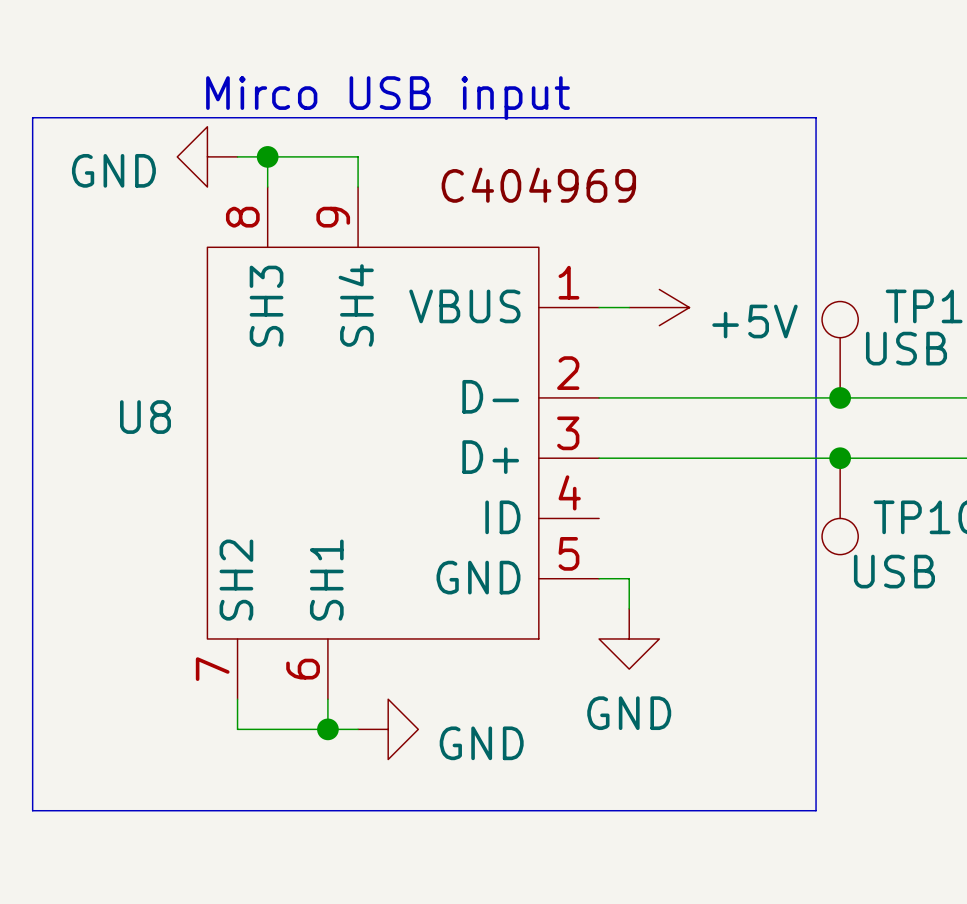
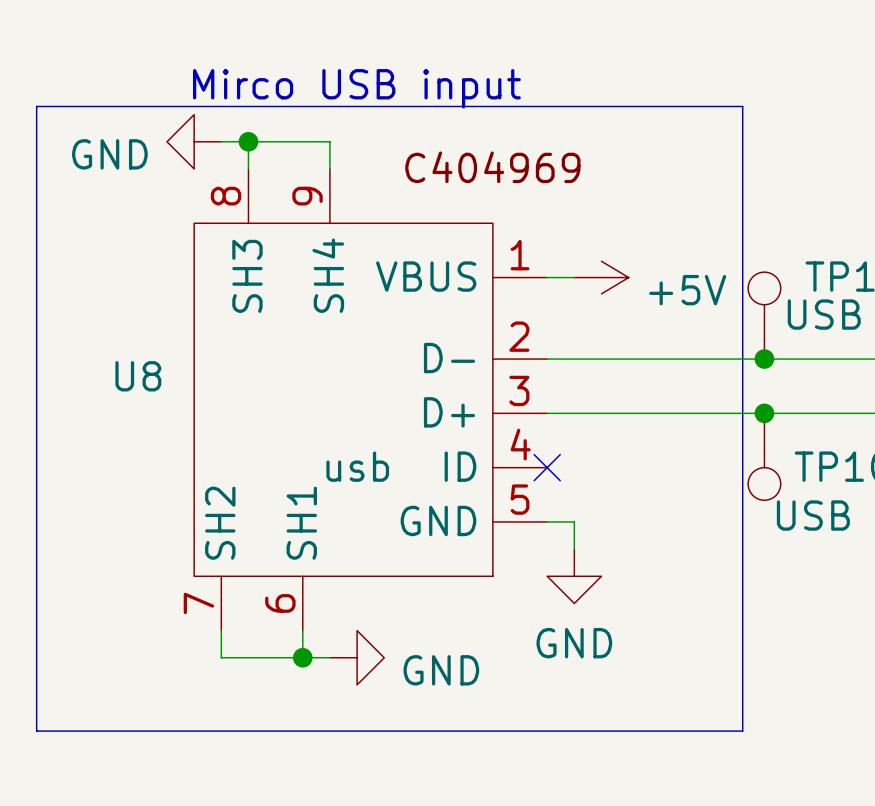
U8 value: none -> usb (357, 466)
no-connect mark: none -> (547, 467)

